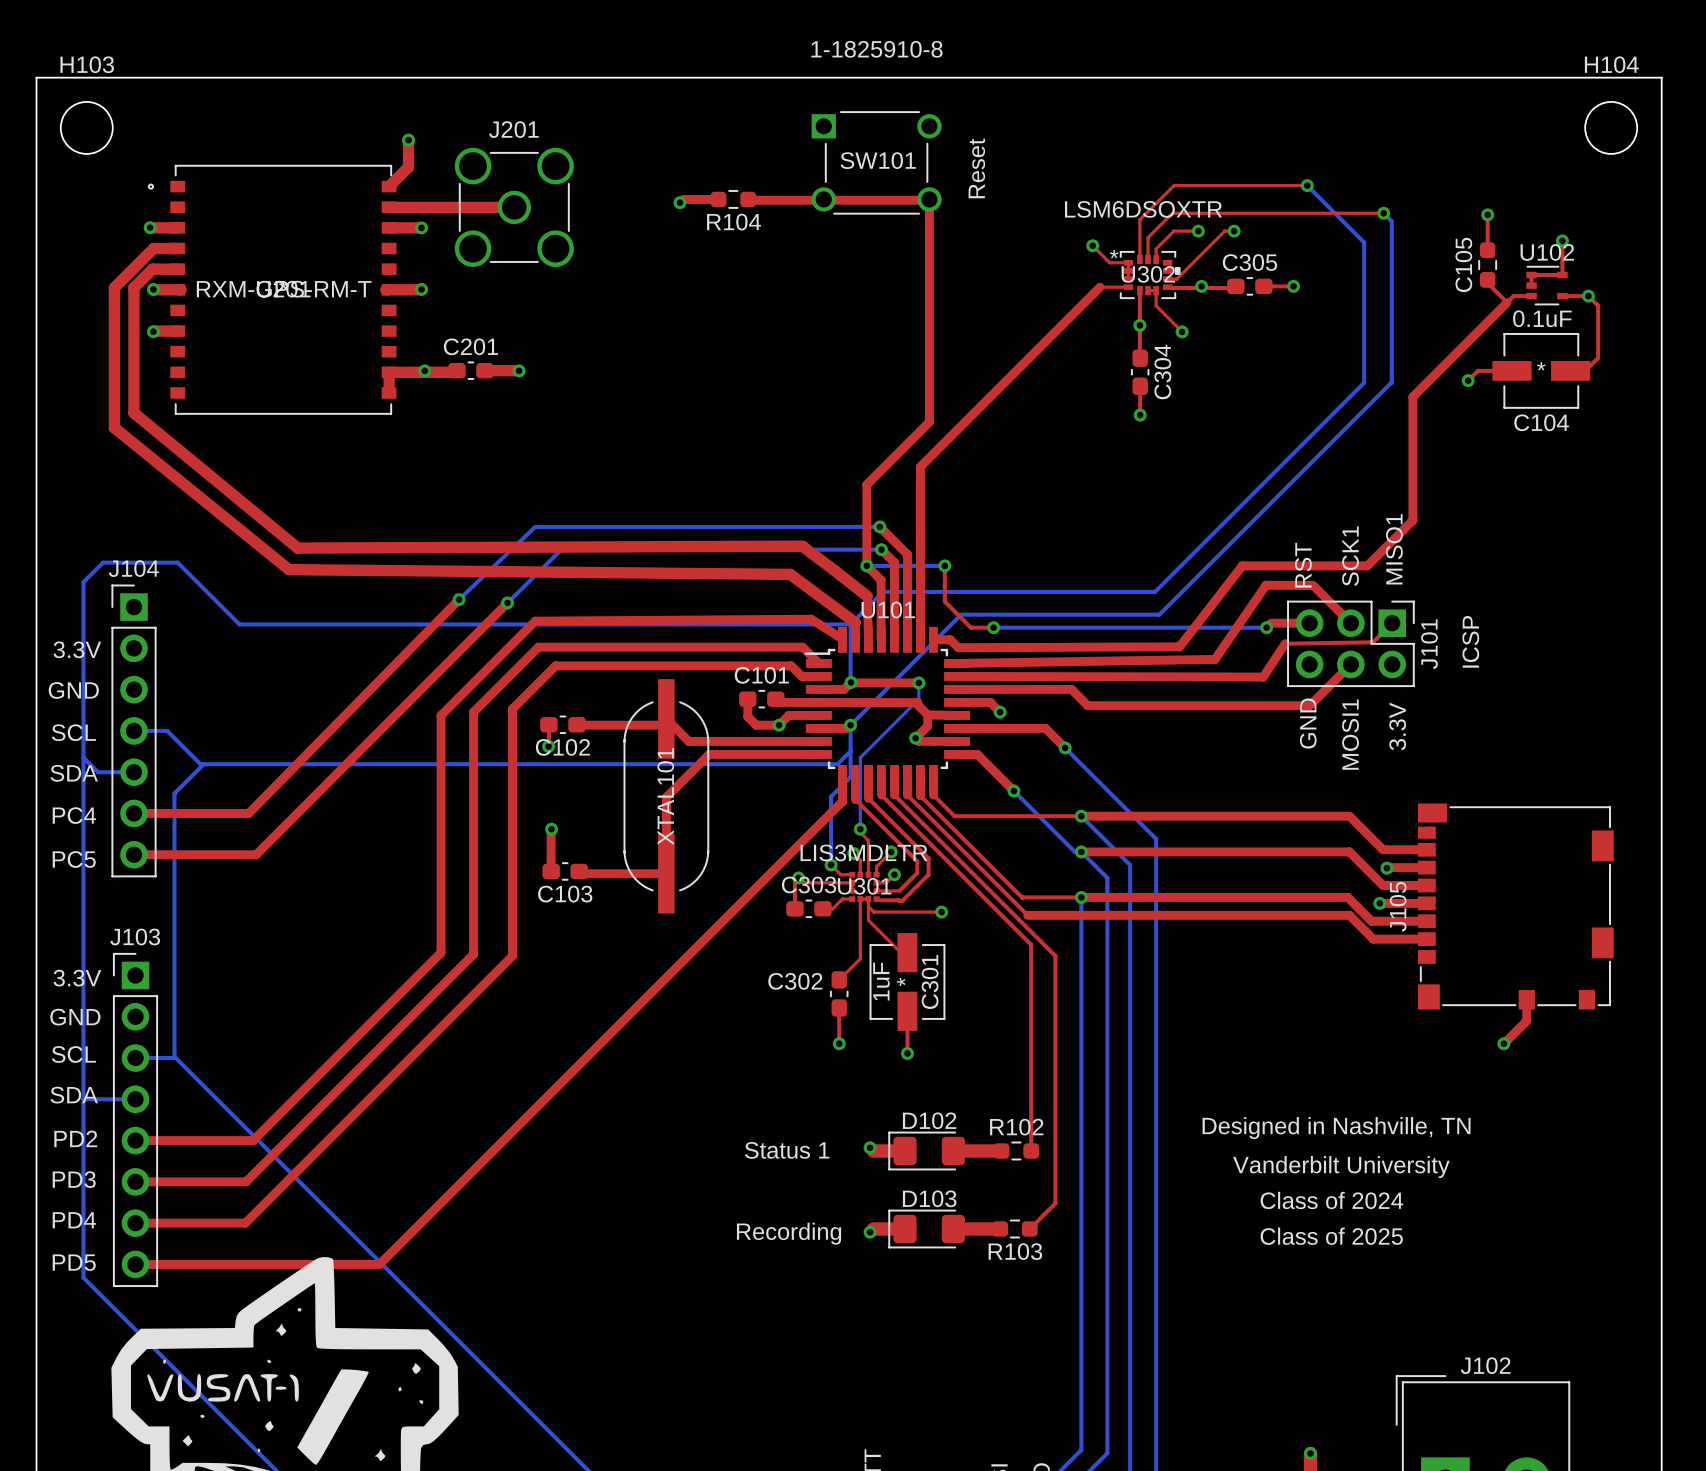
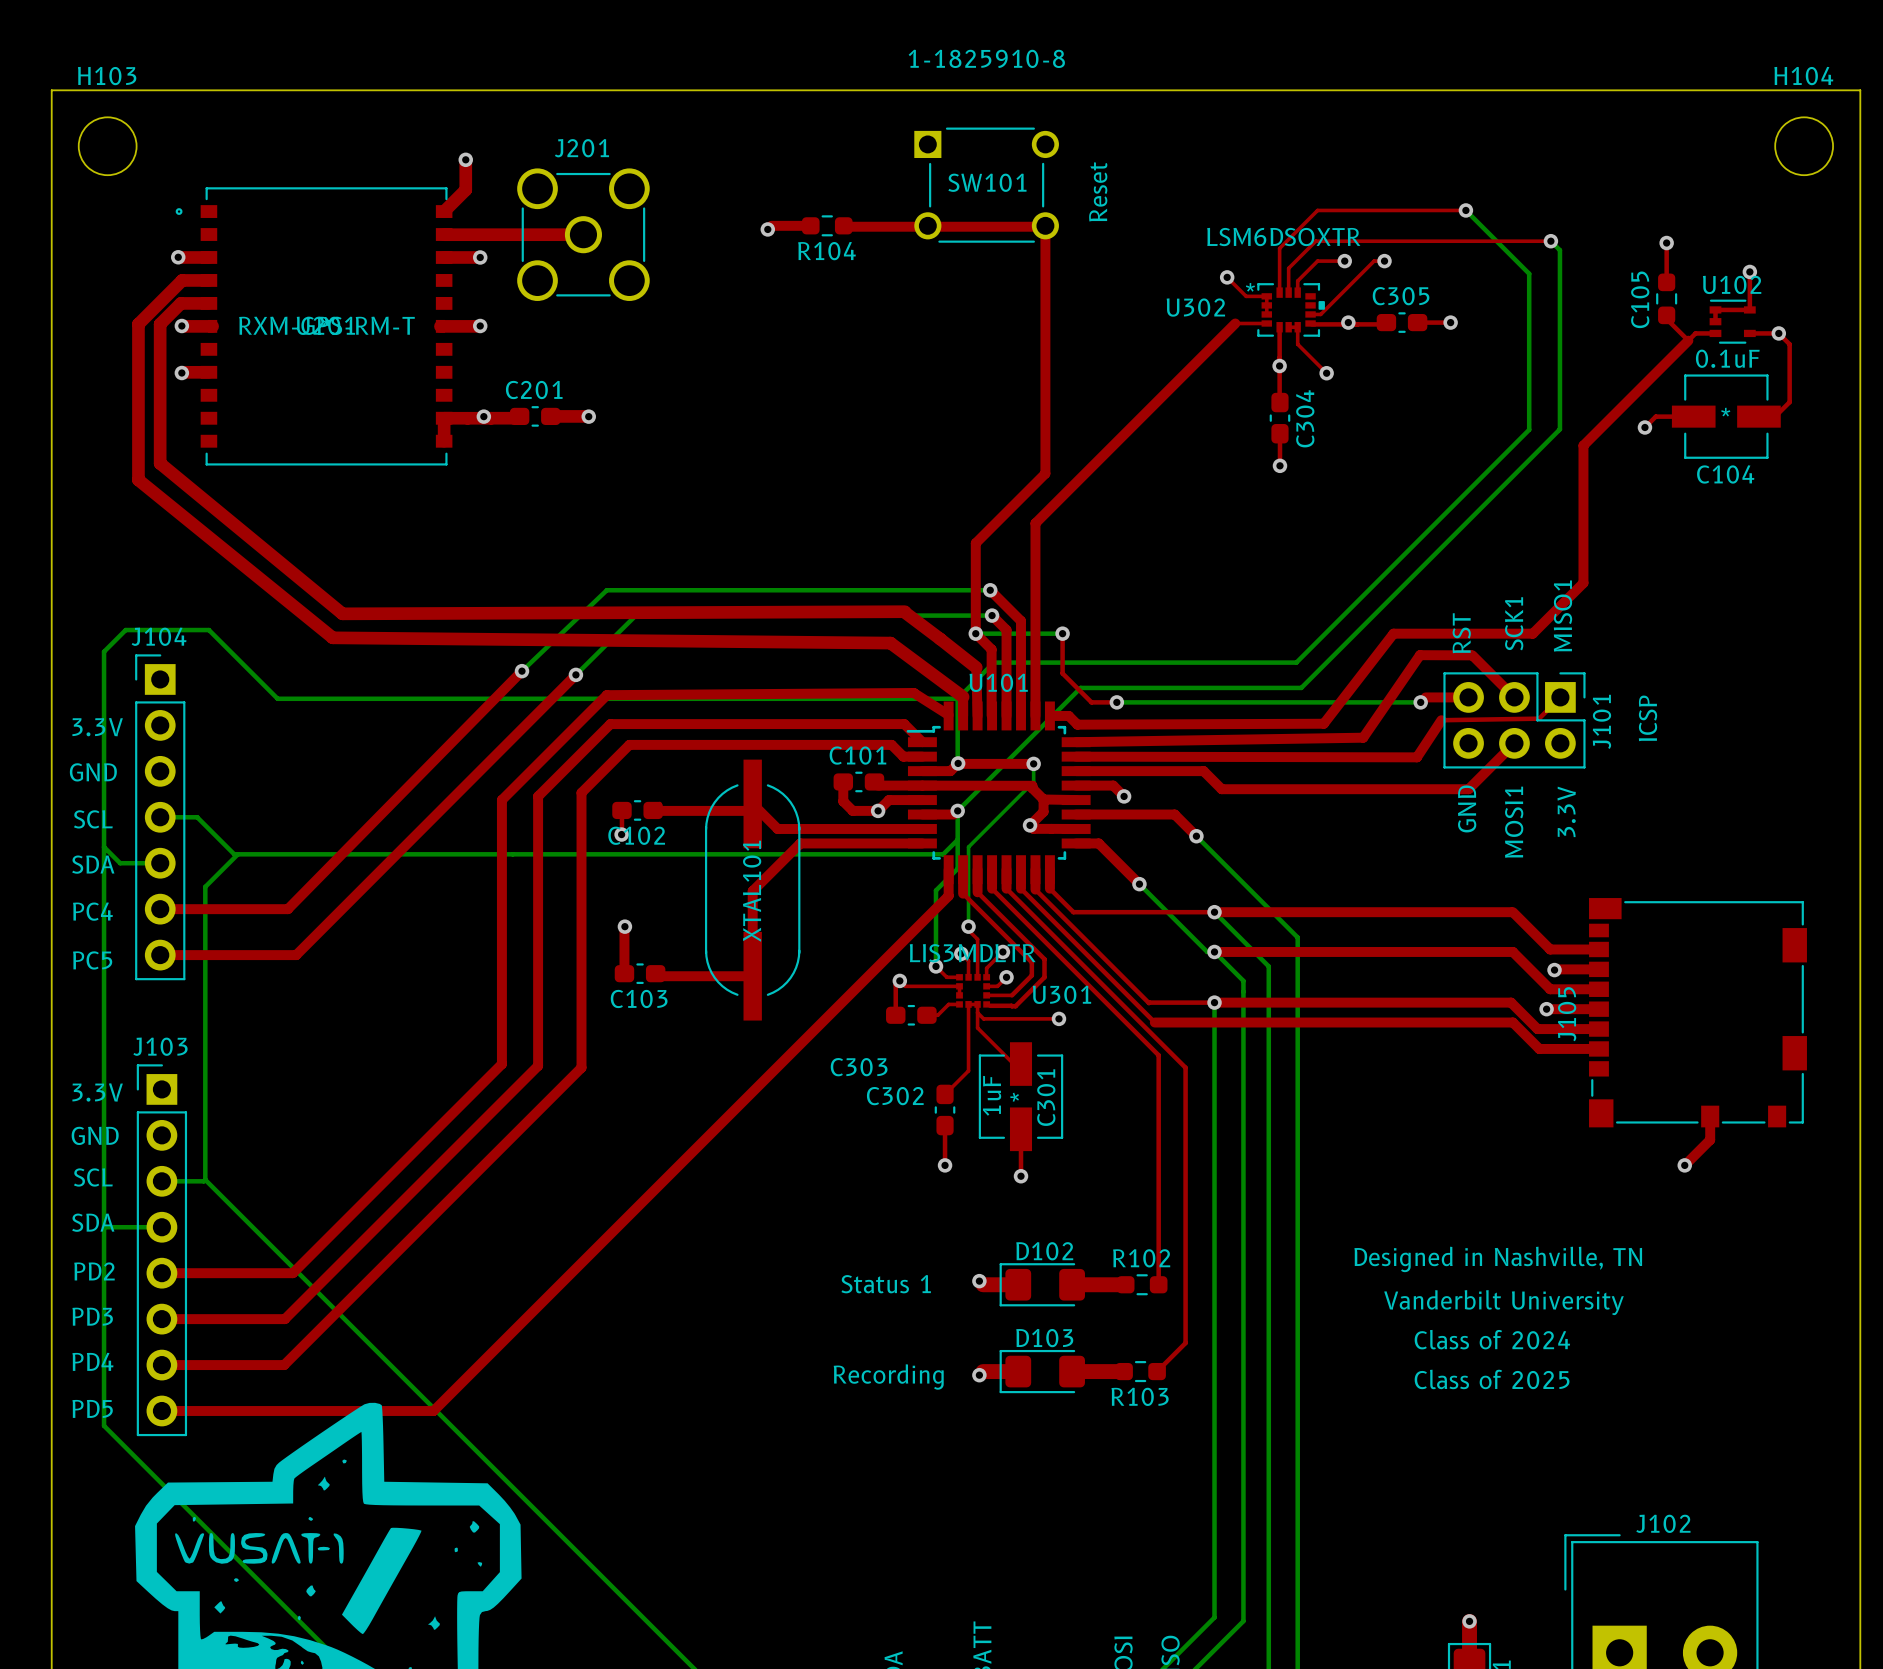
U302 name position: U302 (1148, 274) -> U302 (1195, 307)
C303 name position: C303 (809, 884) -> C303 (859, 1067)
U301 name position: U301 (864, 886) -> U301 (1062, 994)

